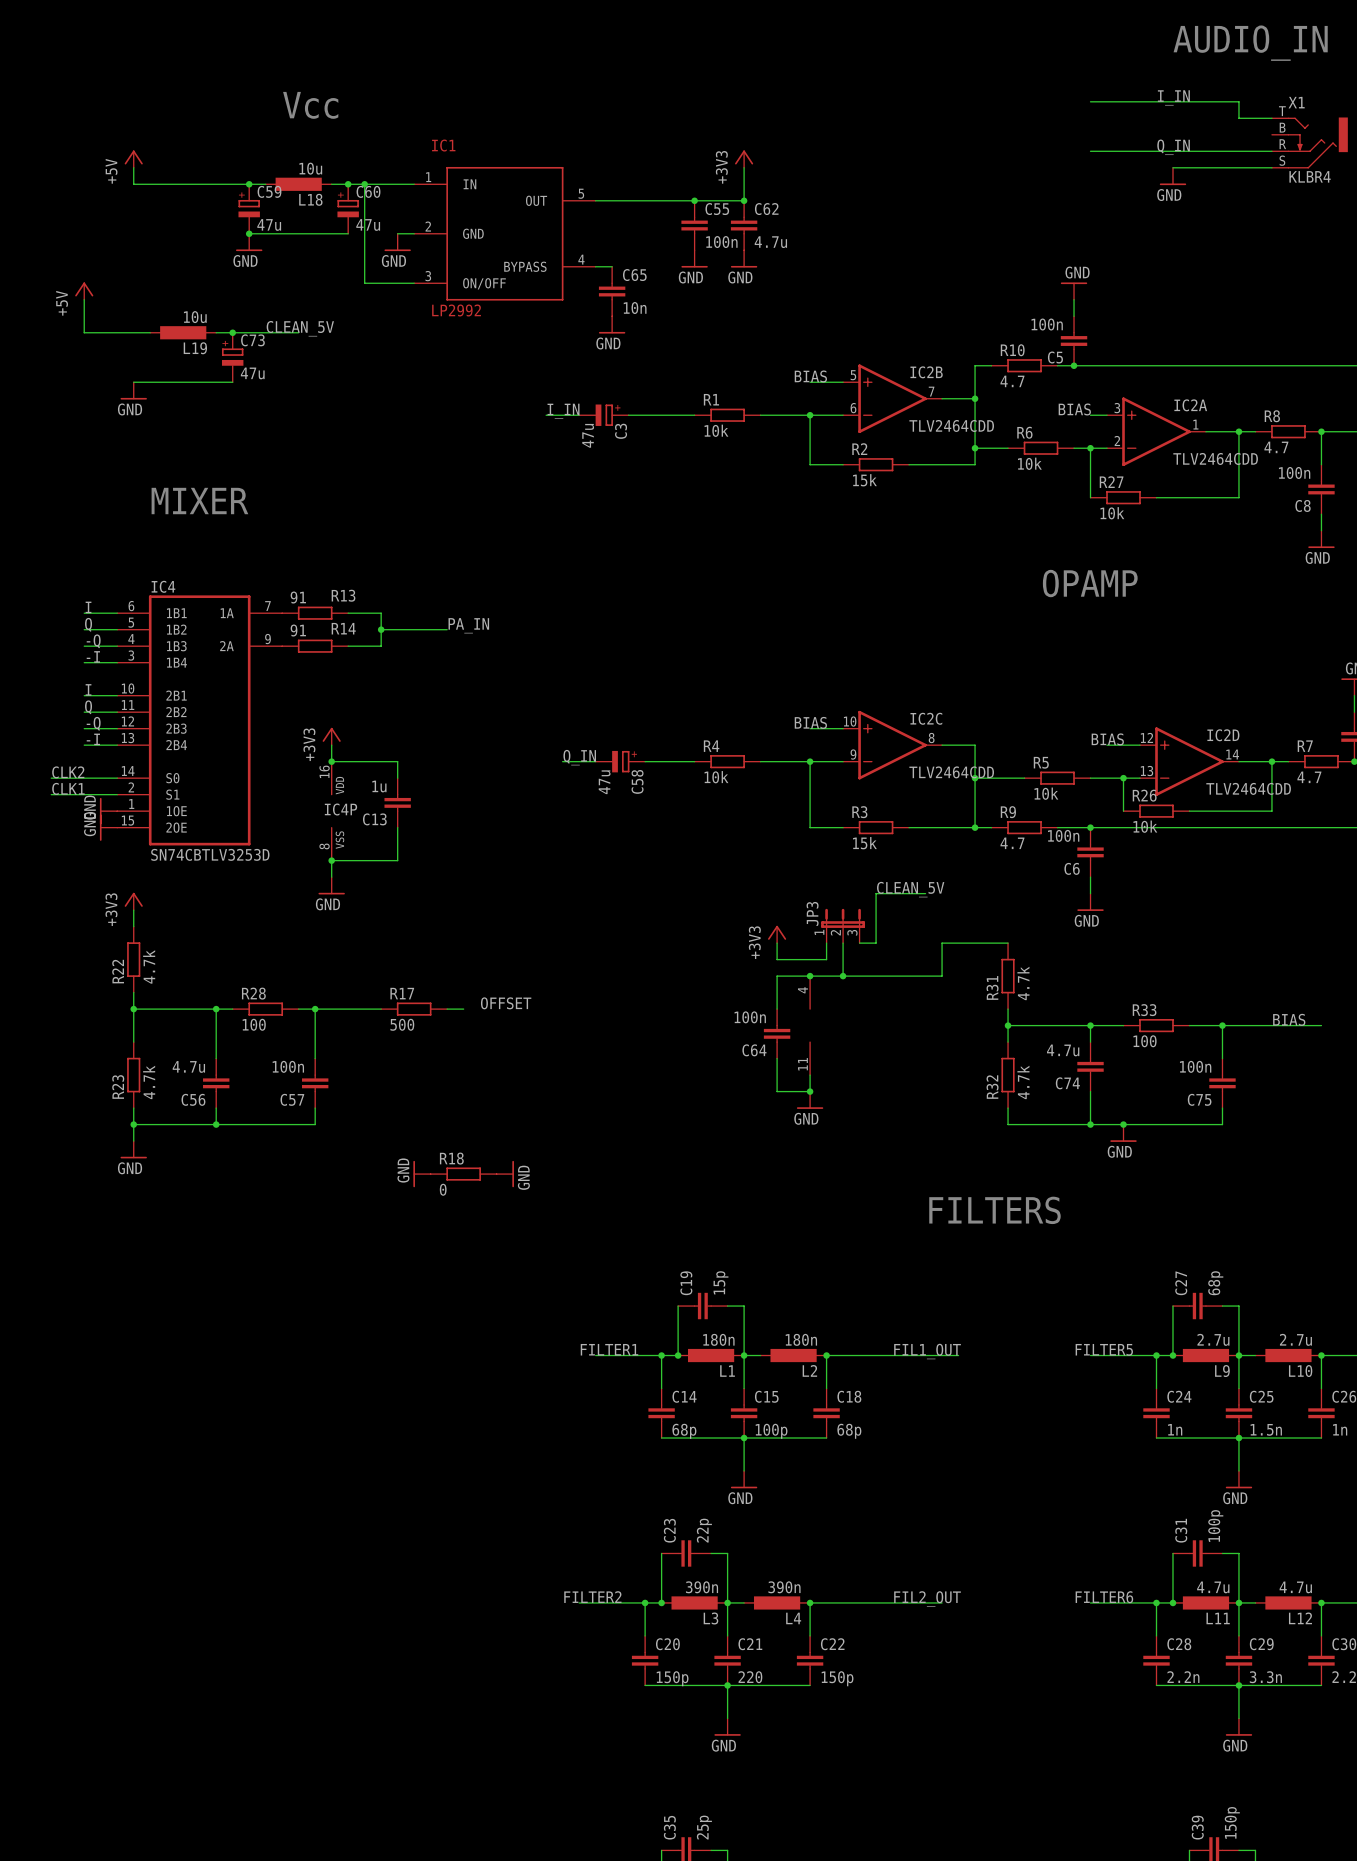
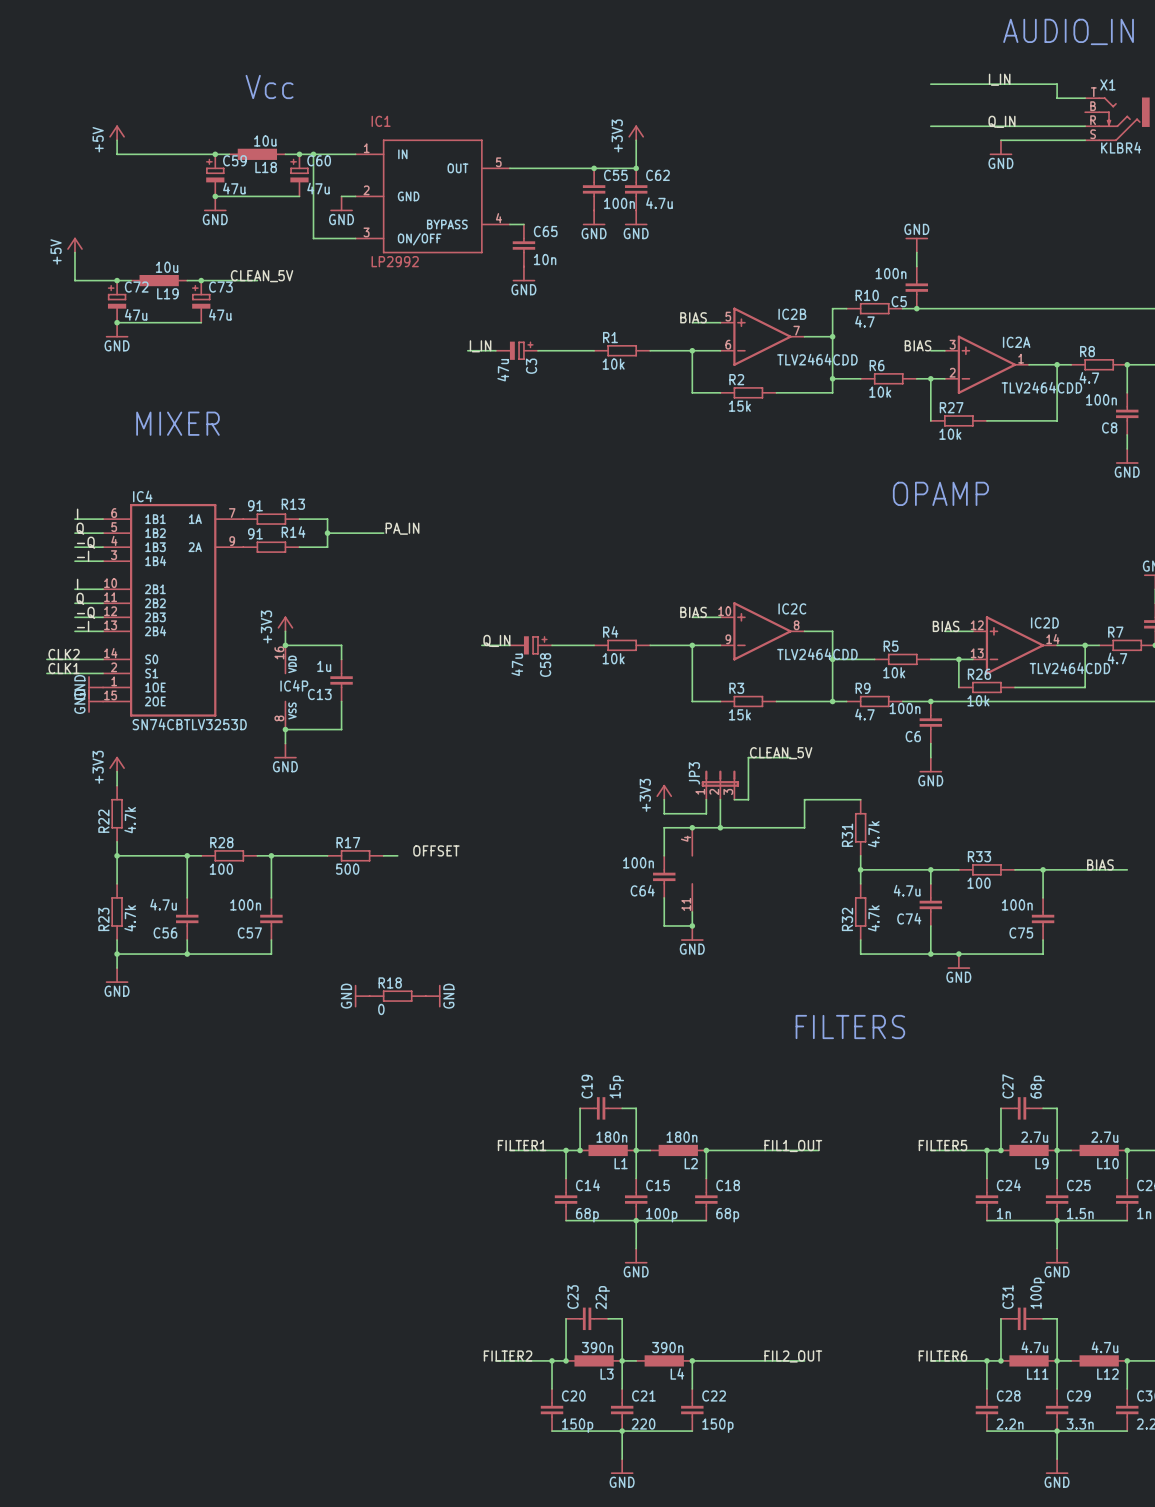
junction: none -> (117, 280)
C72: none -> 47u (117, 301)
junction: none -> (117, 322)

